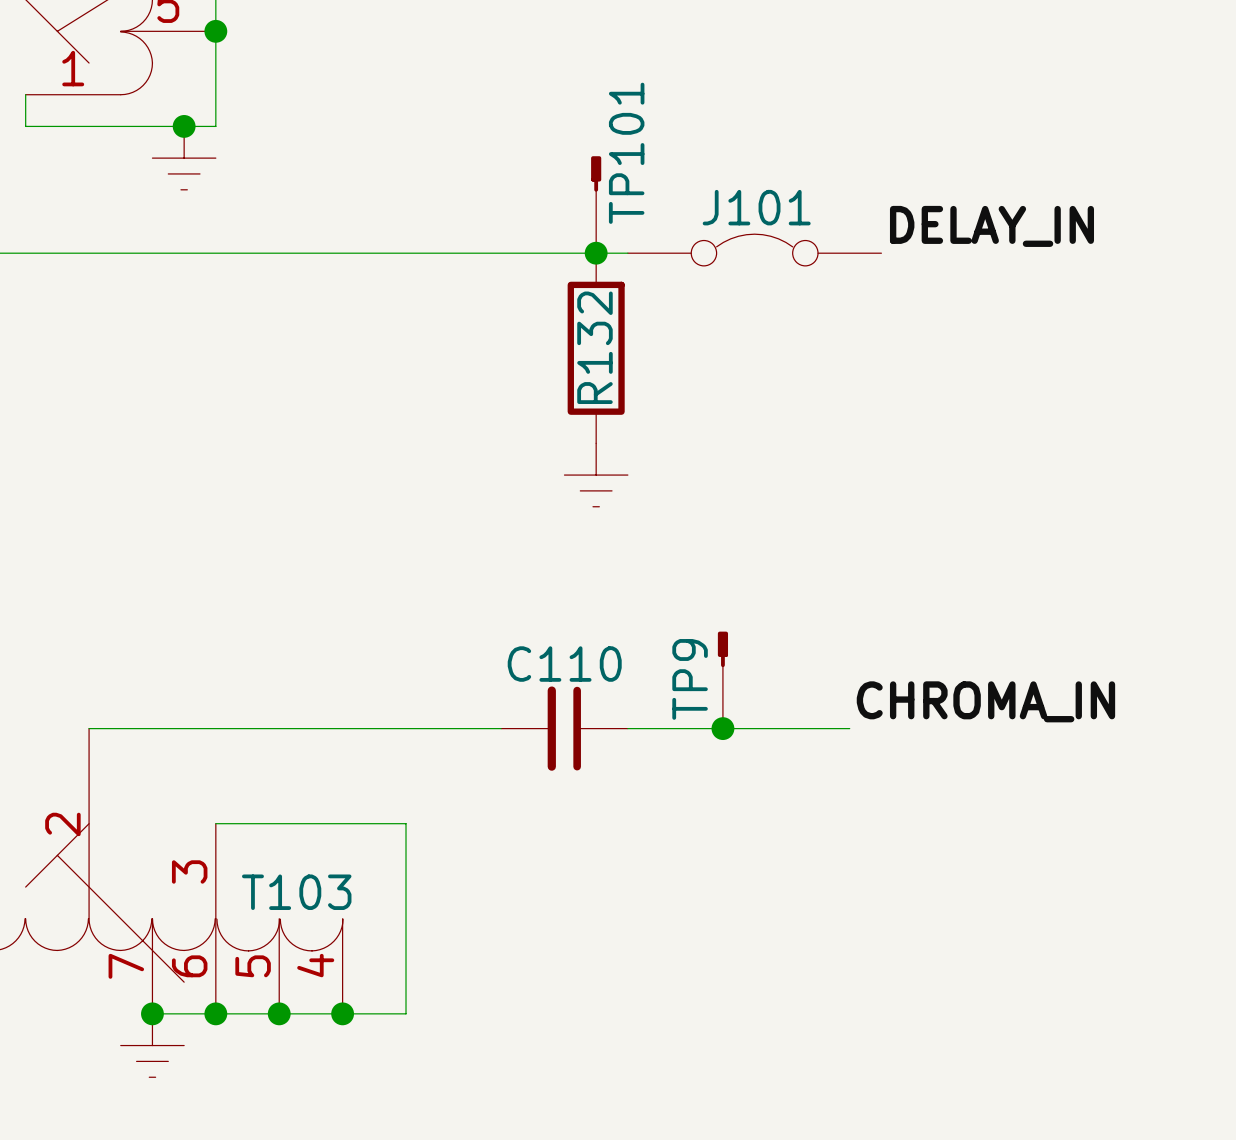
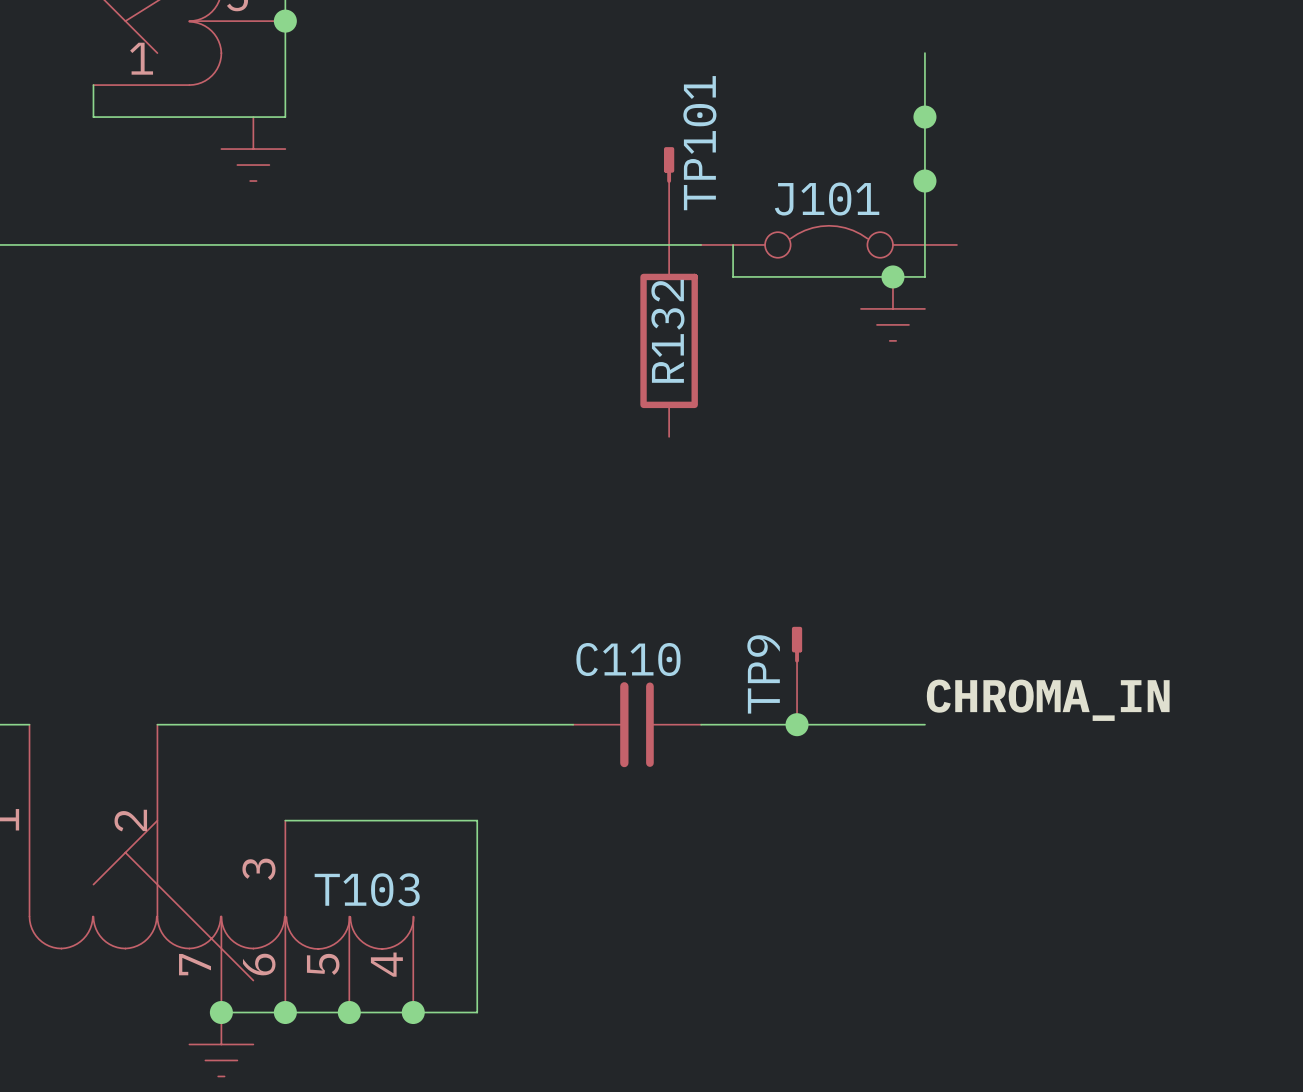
wire: none -> (924, 53) (924, 276) (733, 276) (733, 244)
junction: (184, 126) -> none
junction: none -> (924, 117)
junction: none -> (924, 181)
label: DELAY_IN (991, 226) -> none
junction: (596, 253) -> none
junction: none -> (892, 276)
power symbol position: (596, 475) -> (892, 308)

